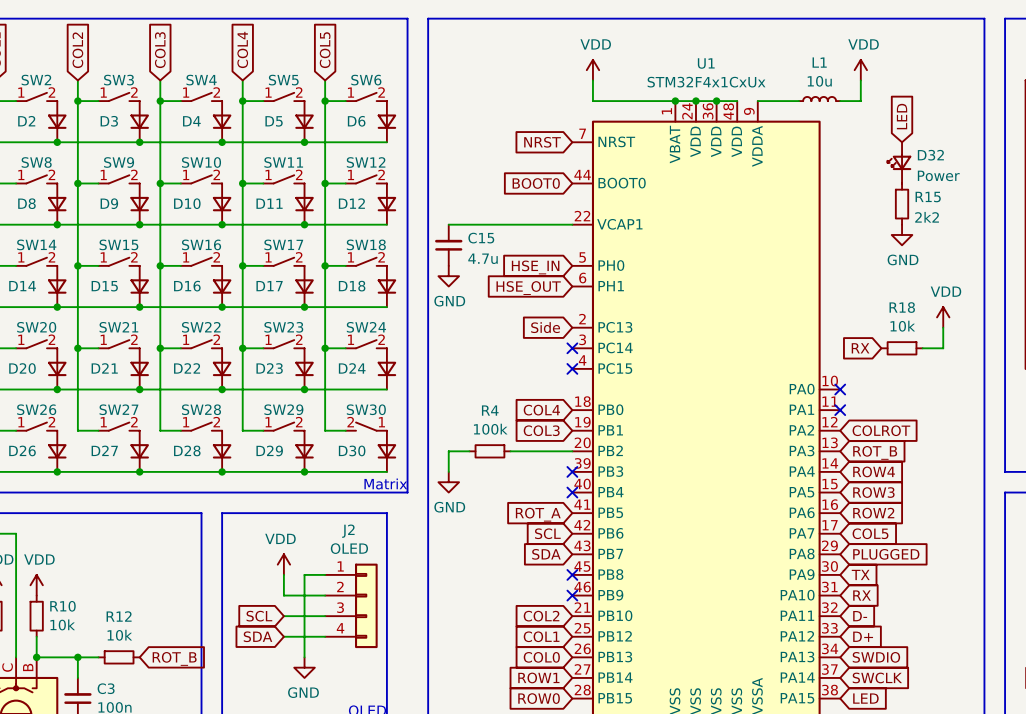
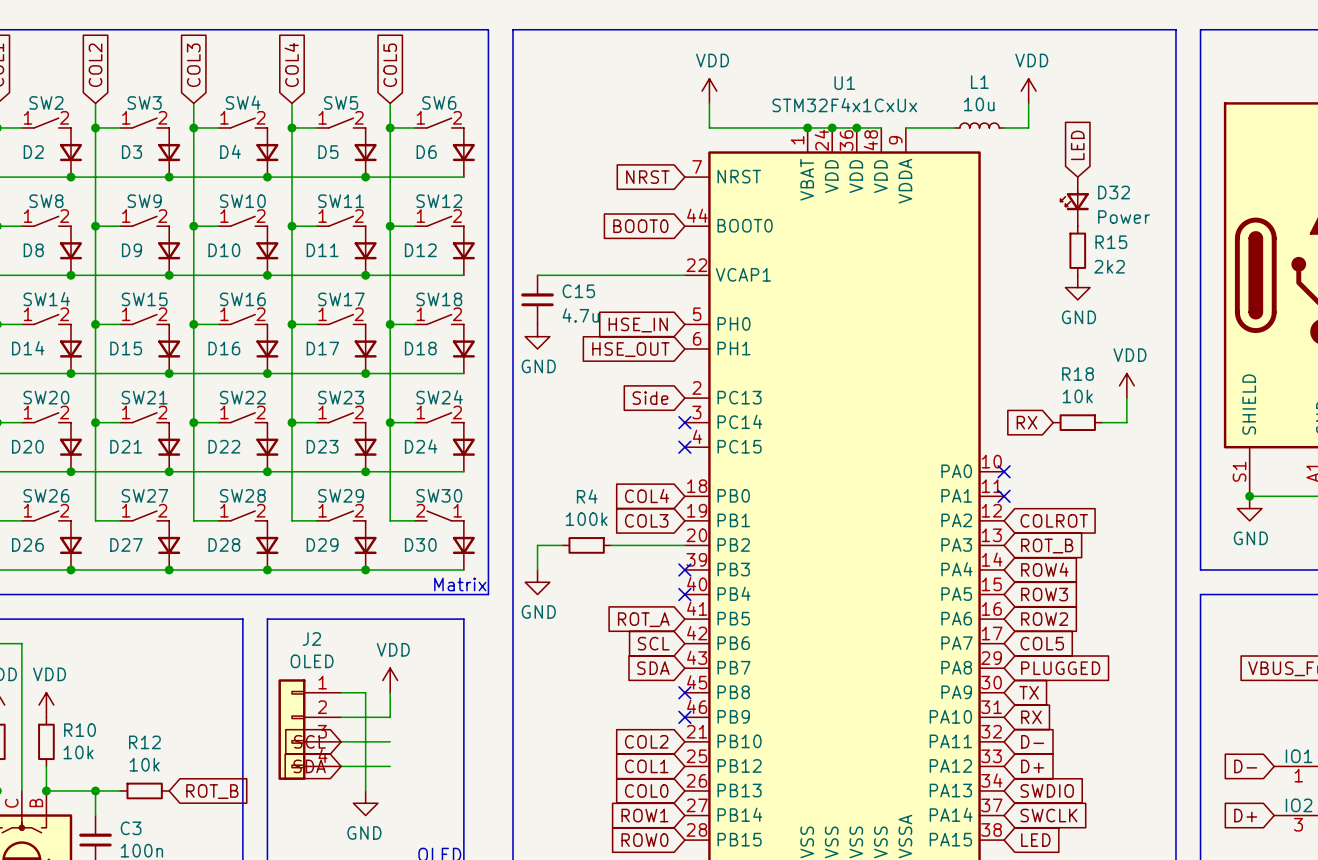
power symbol text position: VDD (280, 538) -> VDD (393, 649)
power symbol position: VDD (283, 564) -> VDD (390, 680)
wire: (283, 574) (283, 595) -> (341, 692) (365, 692)
wire: (304, 574) (325, 574) -> (390, 717) (390, 692)
J2 position: (351, 605) -> (309, 729)
J2 flip: as is (366, 605) -> left-right (291, 729)

